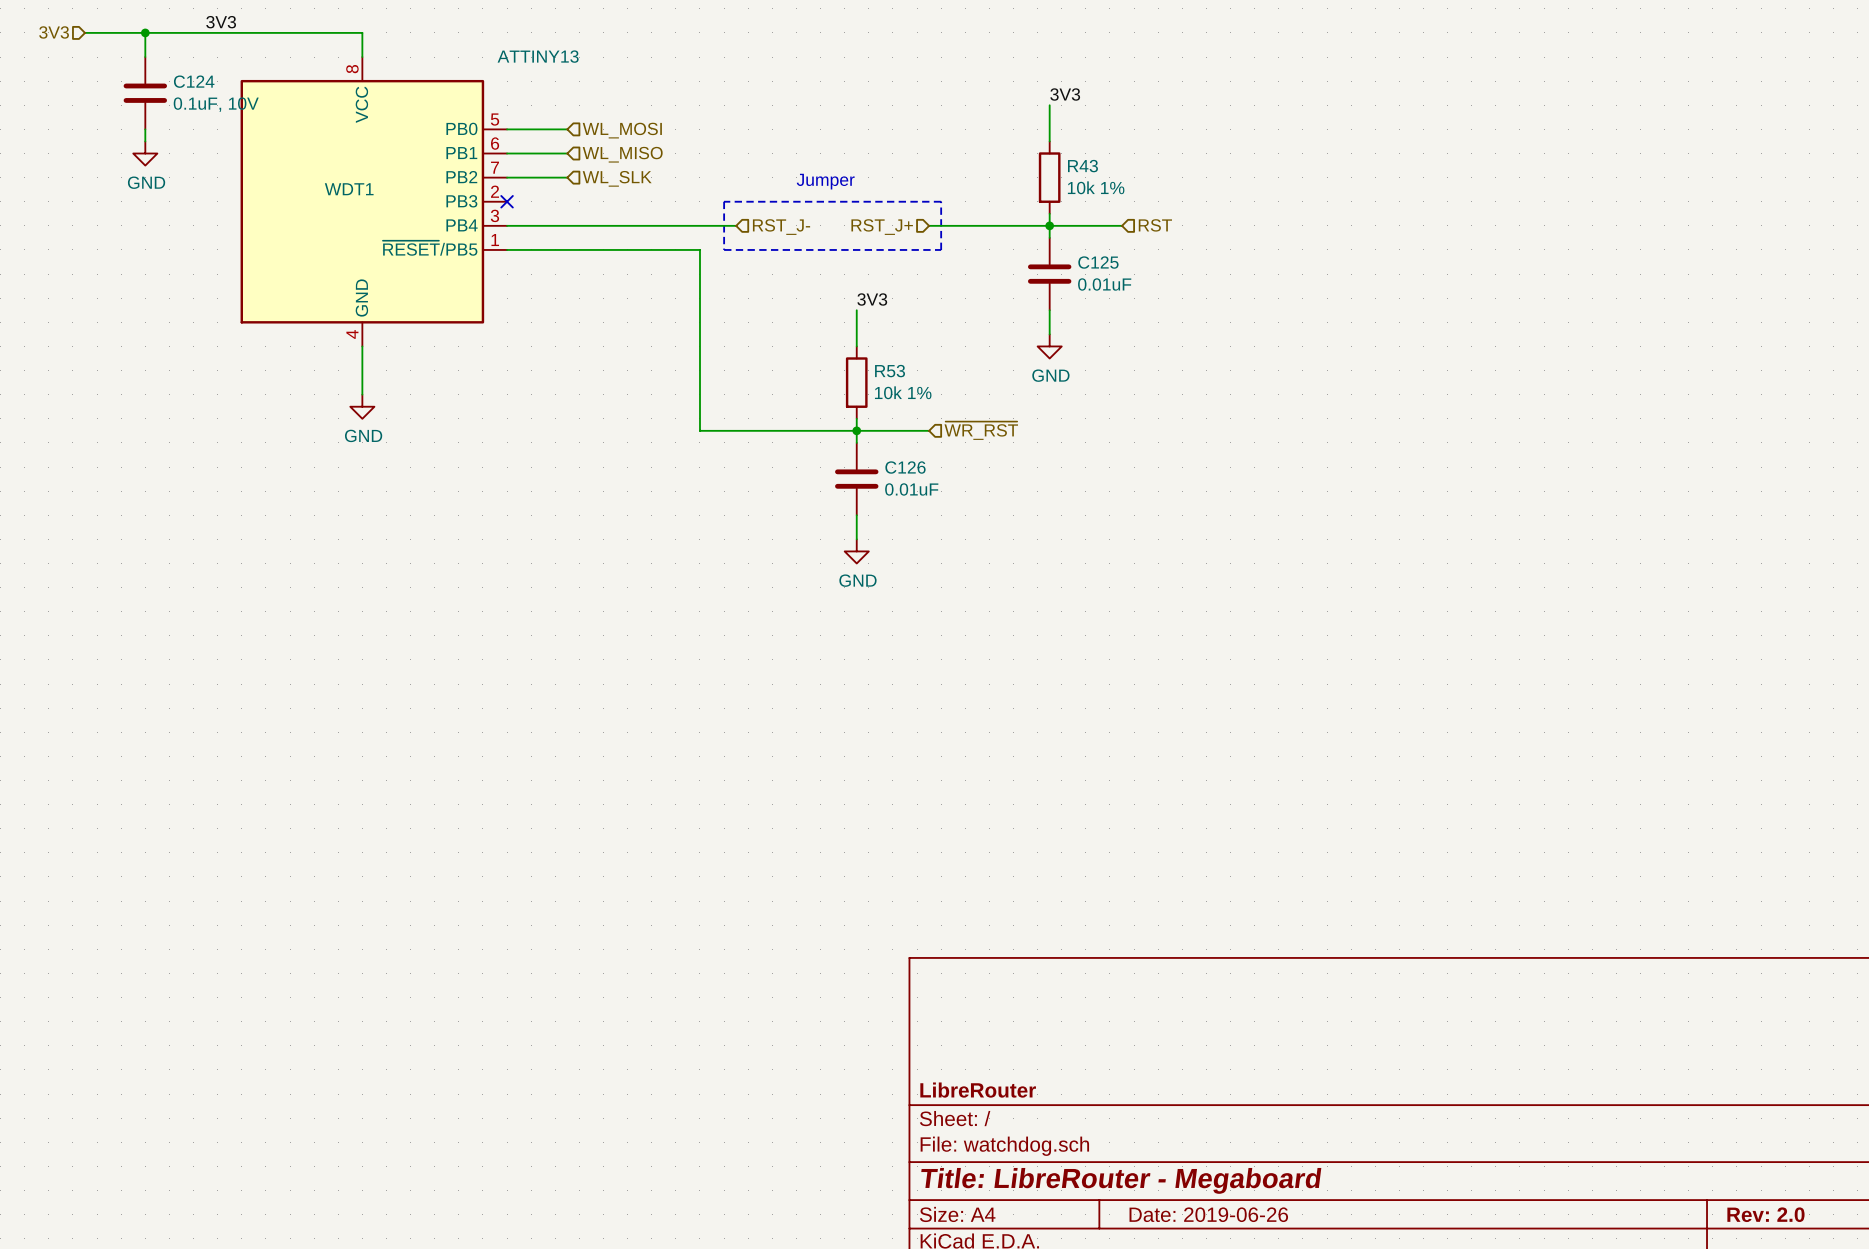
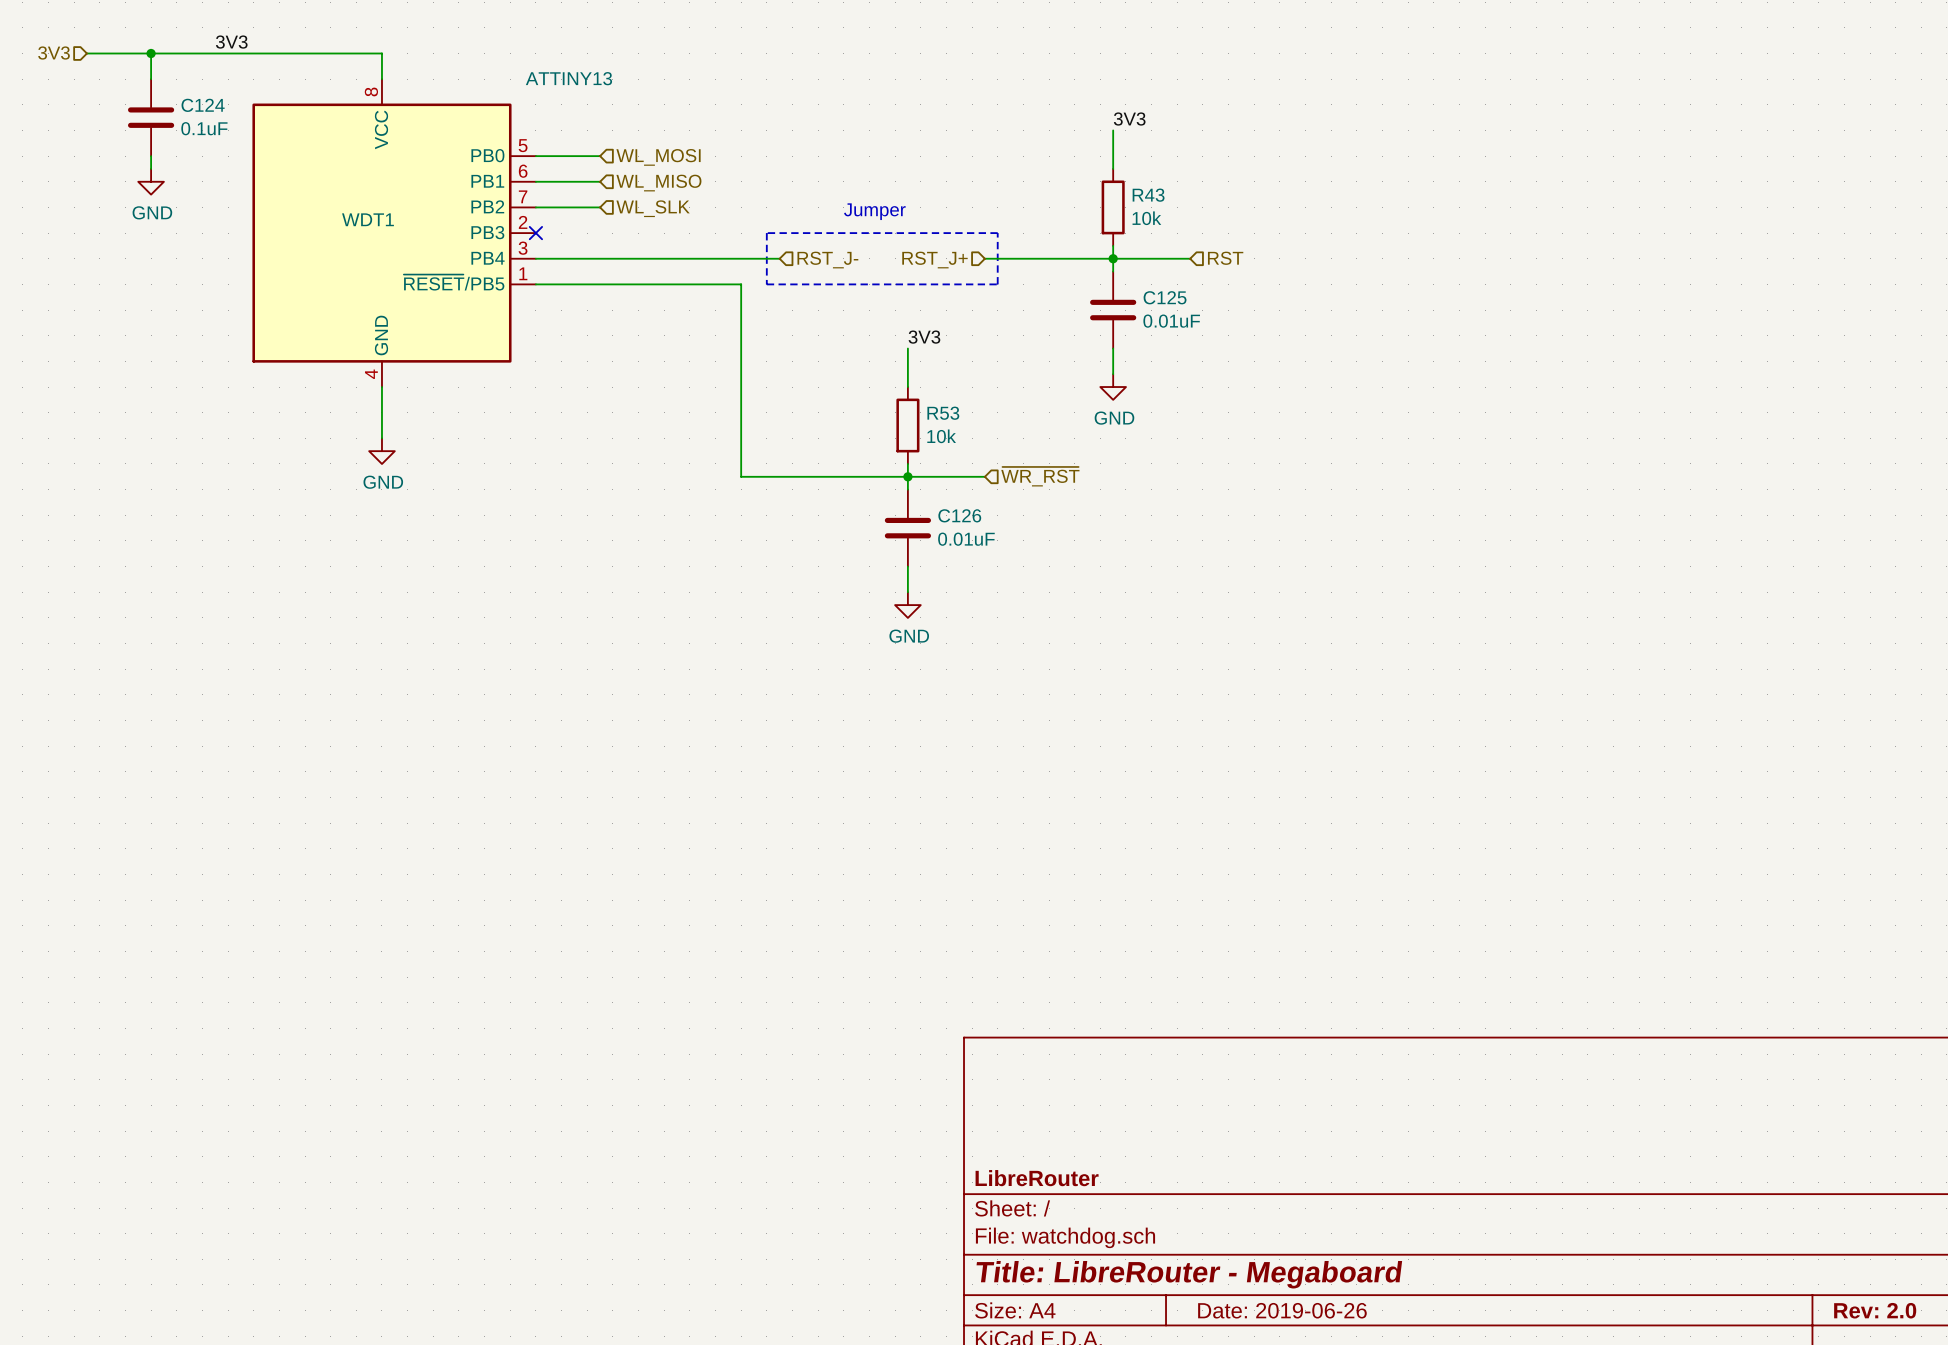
C124 value: 0.1uF, 10V (216, 104) -> 0.1uF (204, 128)
R43 value: 10k 1% (1096, 187) -> 10k (1146, 218)
R53 value: 10k 1% (903, 392) -> 10k (941, 436)

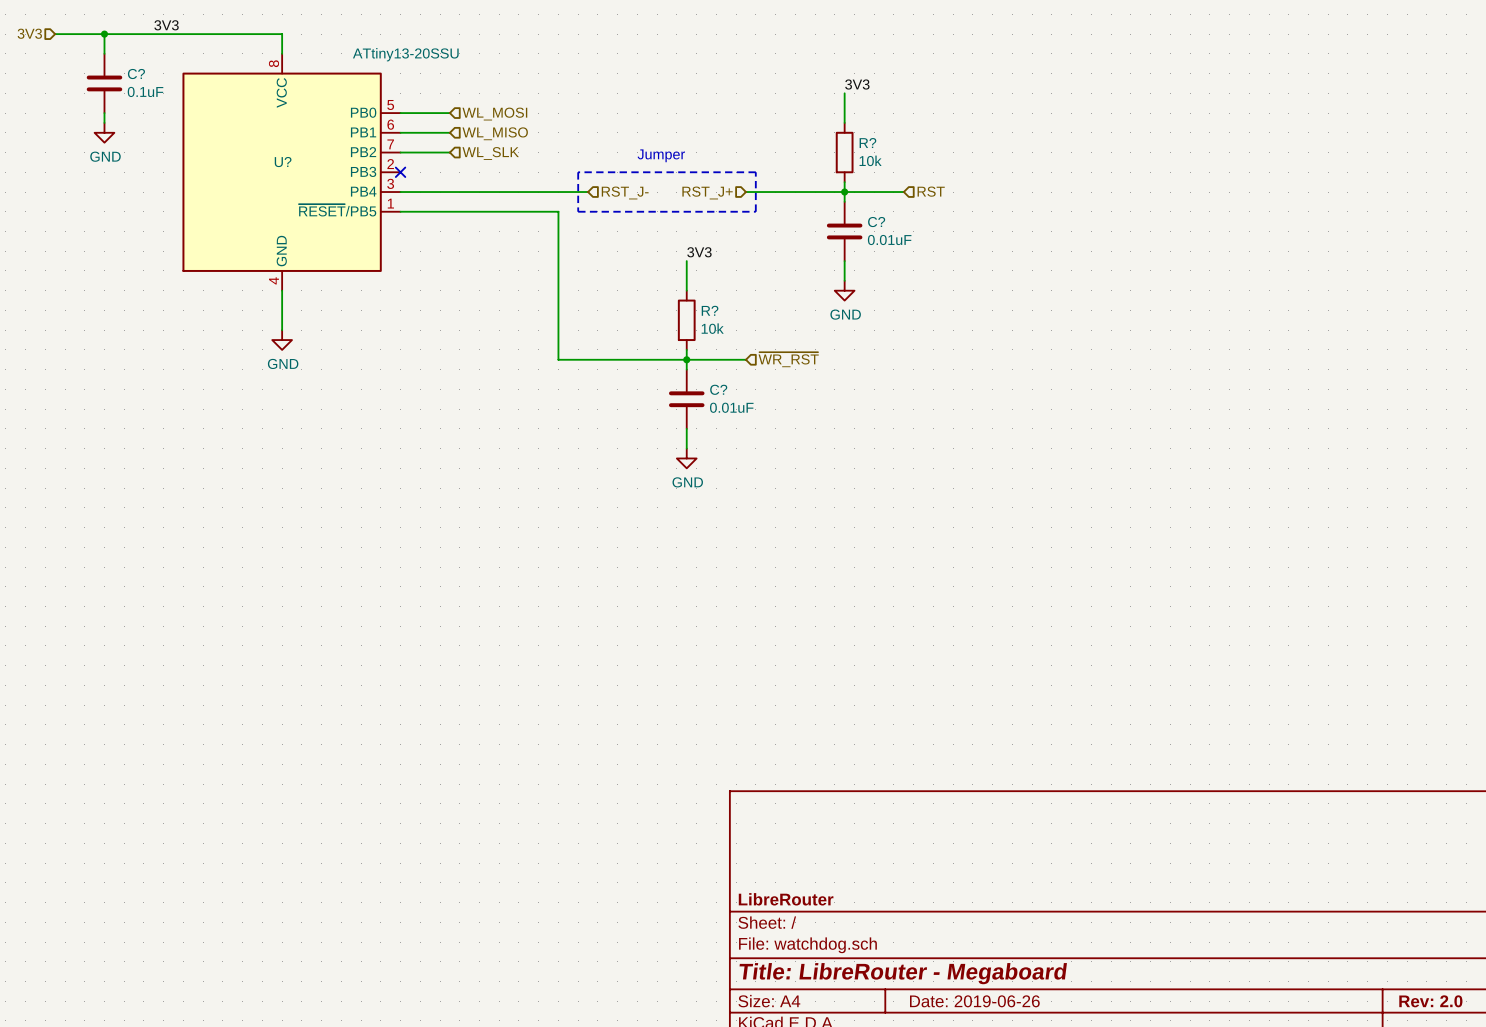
WDT1 value: ATTINY13 (568, 78) -> ATtiny13-20SSU (405, 54)
C124 name: C124 (203, 105) -> C? (136, 74)
R43 name: R43 (1148, 195) -> R? (867, 143)
WDT1 name: WDT1 (367, 219) -> U? (283, 162)
C125 name: C125 (1165, 297) -> C? (876, 222)
R53 name: R53 (943, 413) -> R? (710, 310)
C126 name: C126 (959, 515) -> C? (718, 389)

